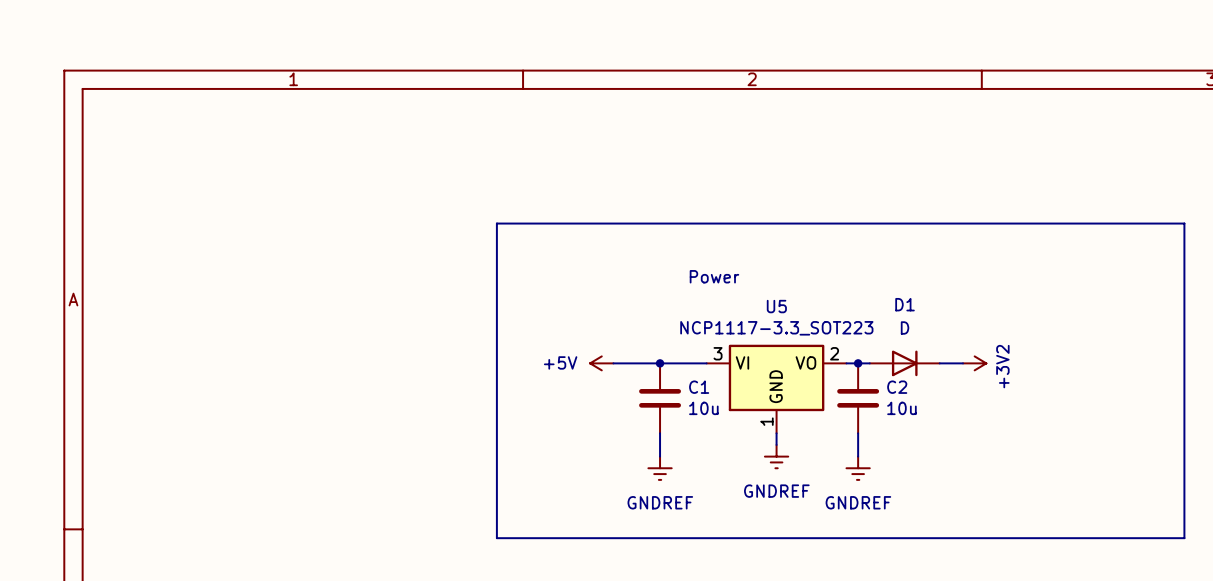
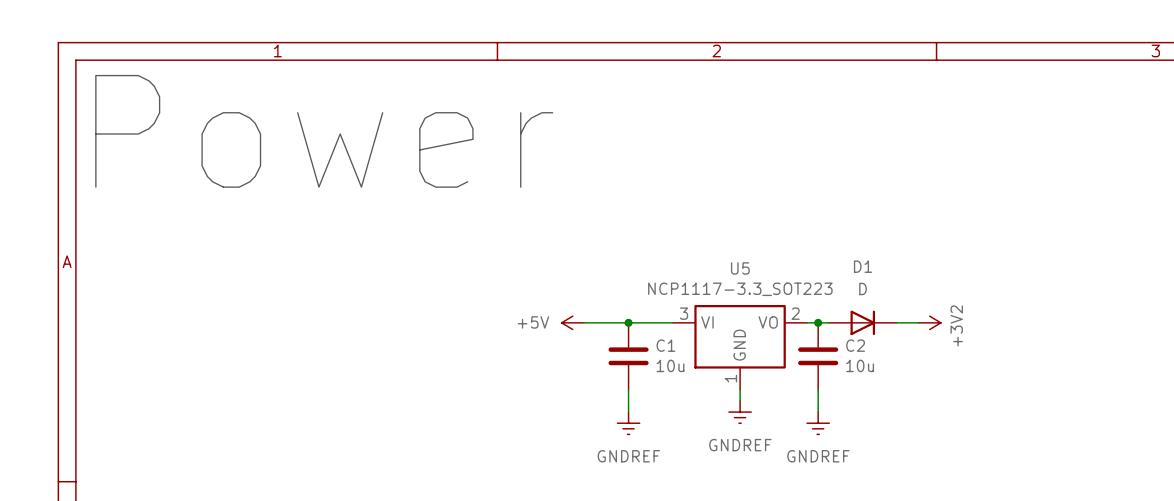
text: none -> Power (324, 131)
line: (496, 223) (1184, 223) (1184, 538) (496, 538) (496, 223) -> none
text: Power (714, 276) -> none

